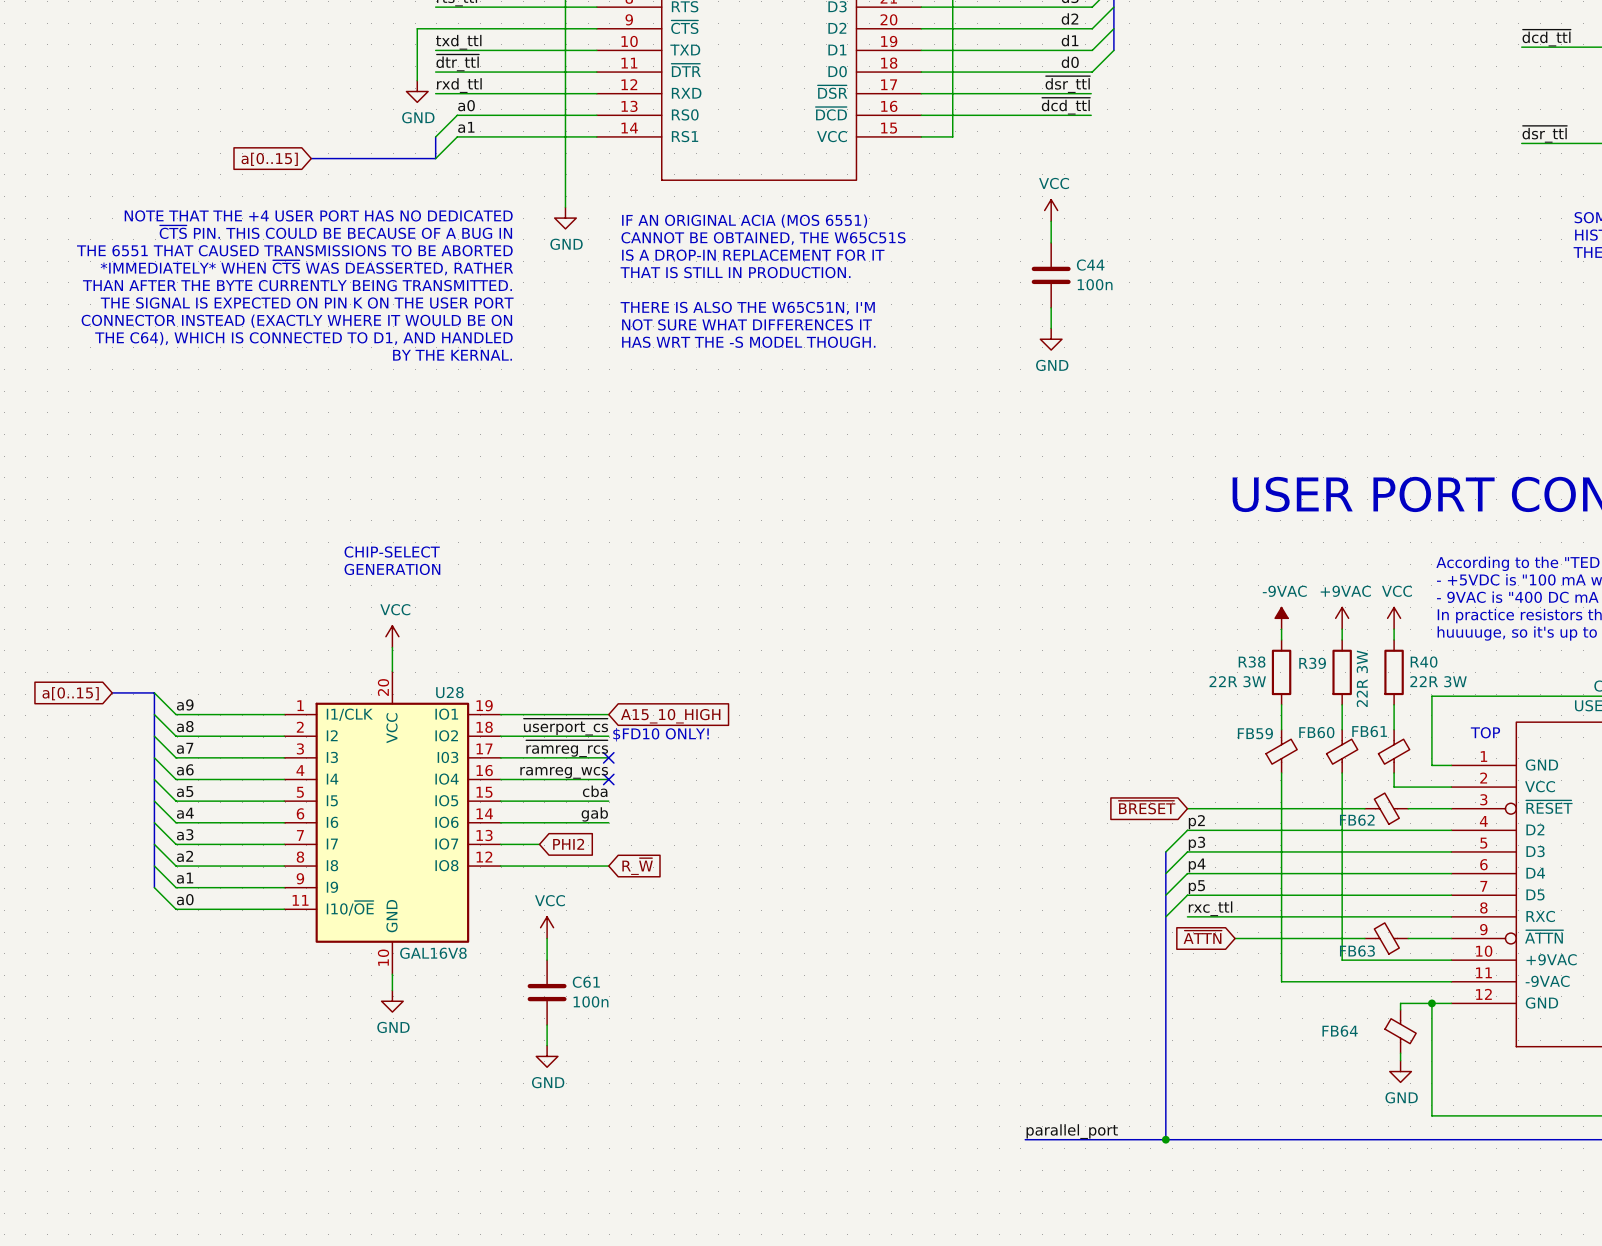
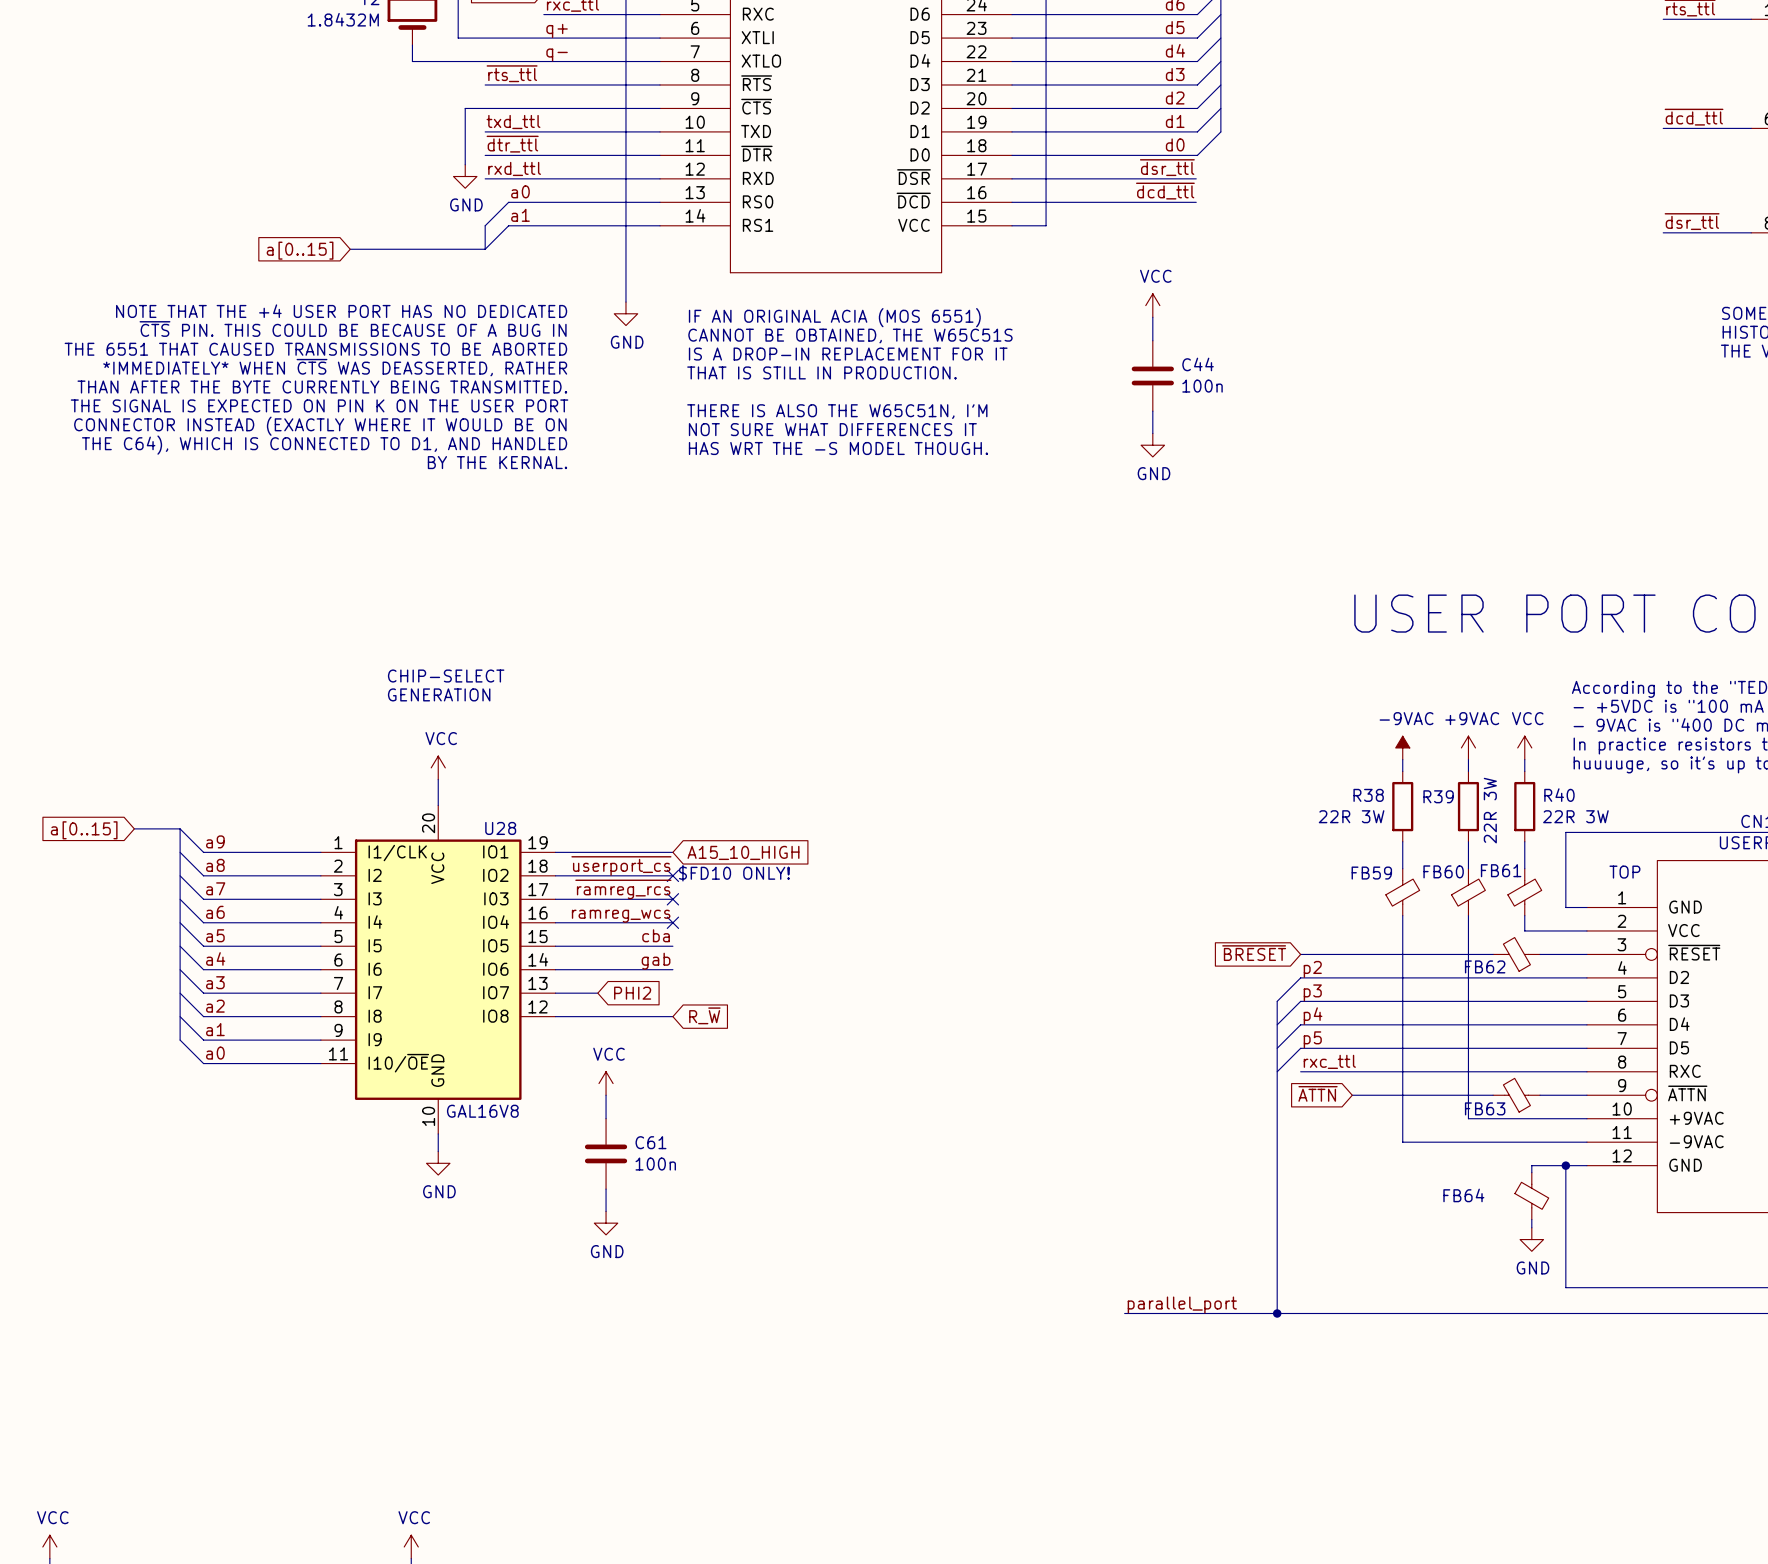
no-connect mark: none -> (672, 875)

